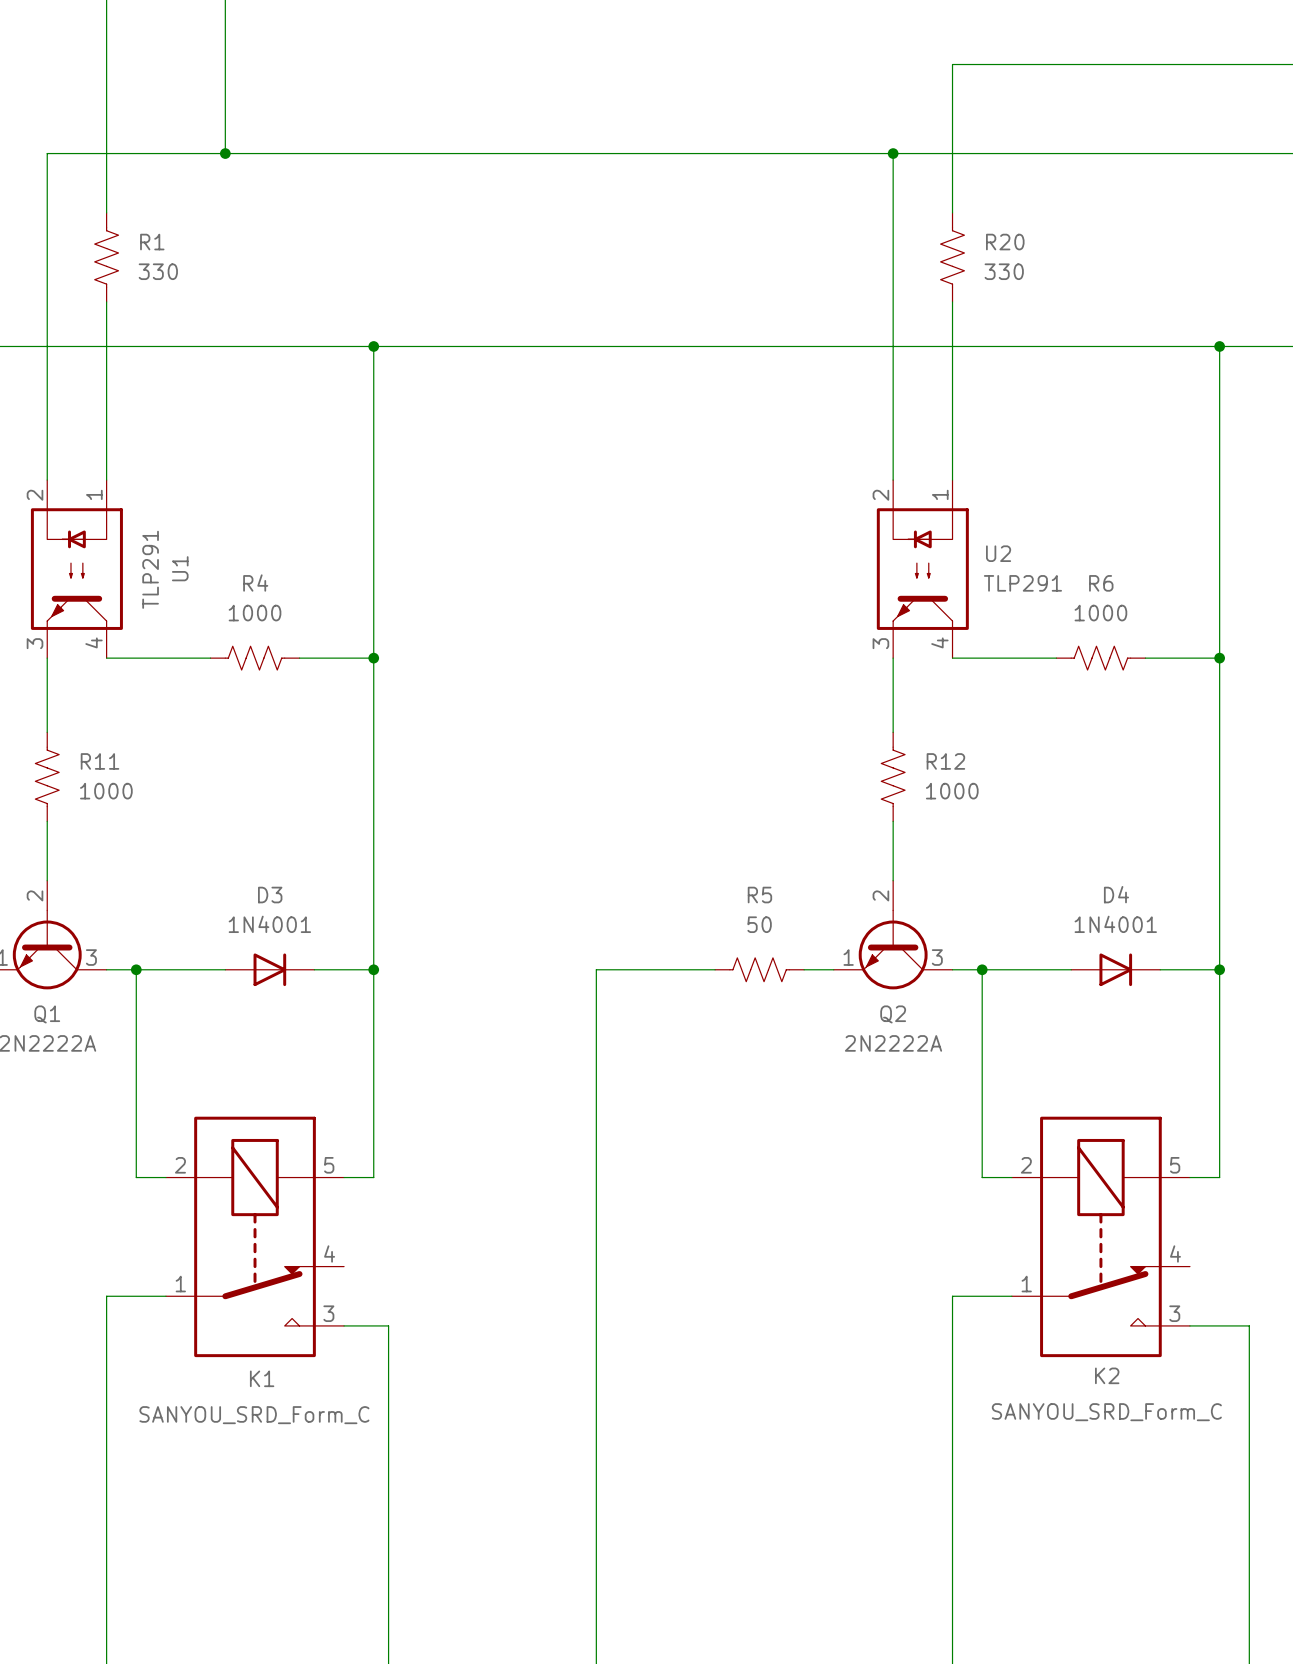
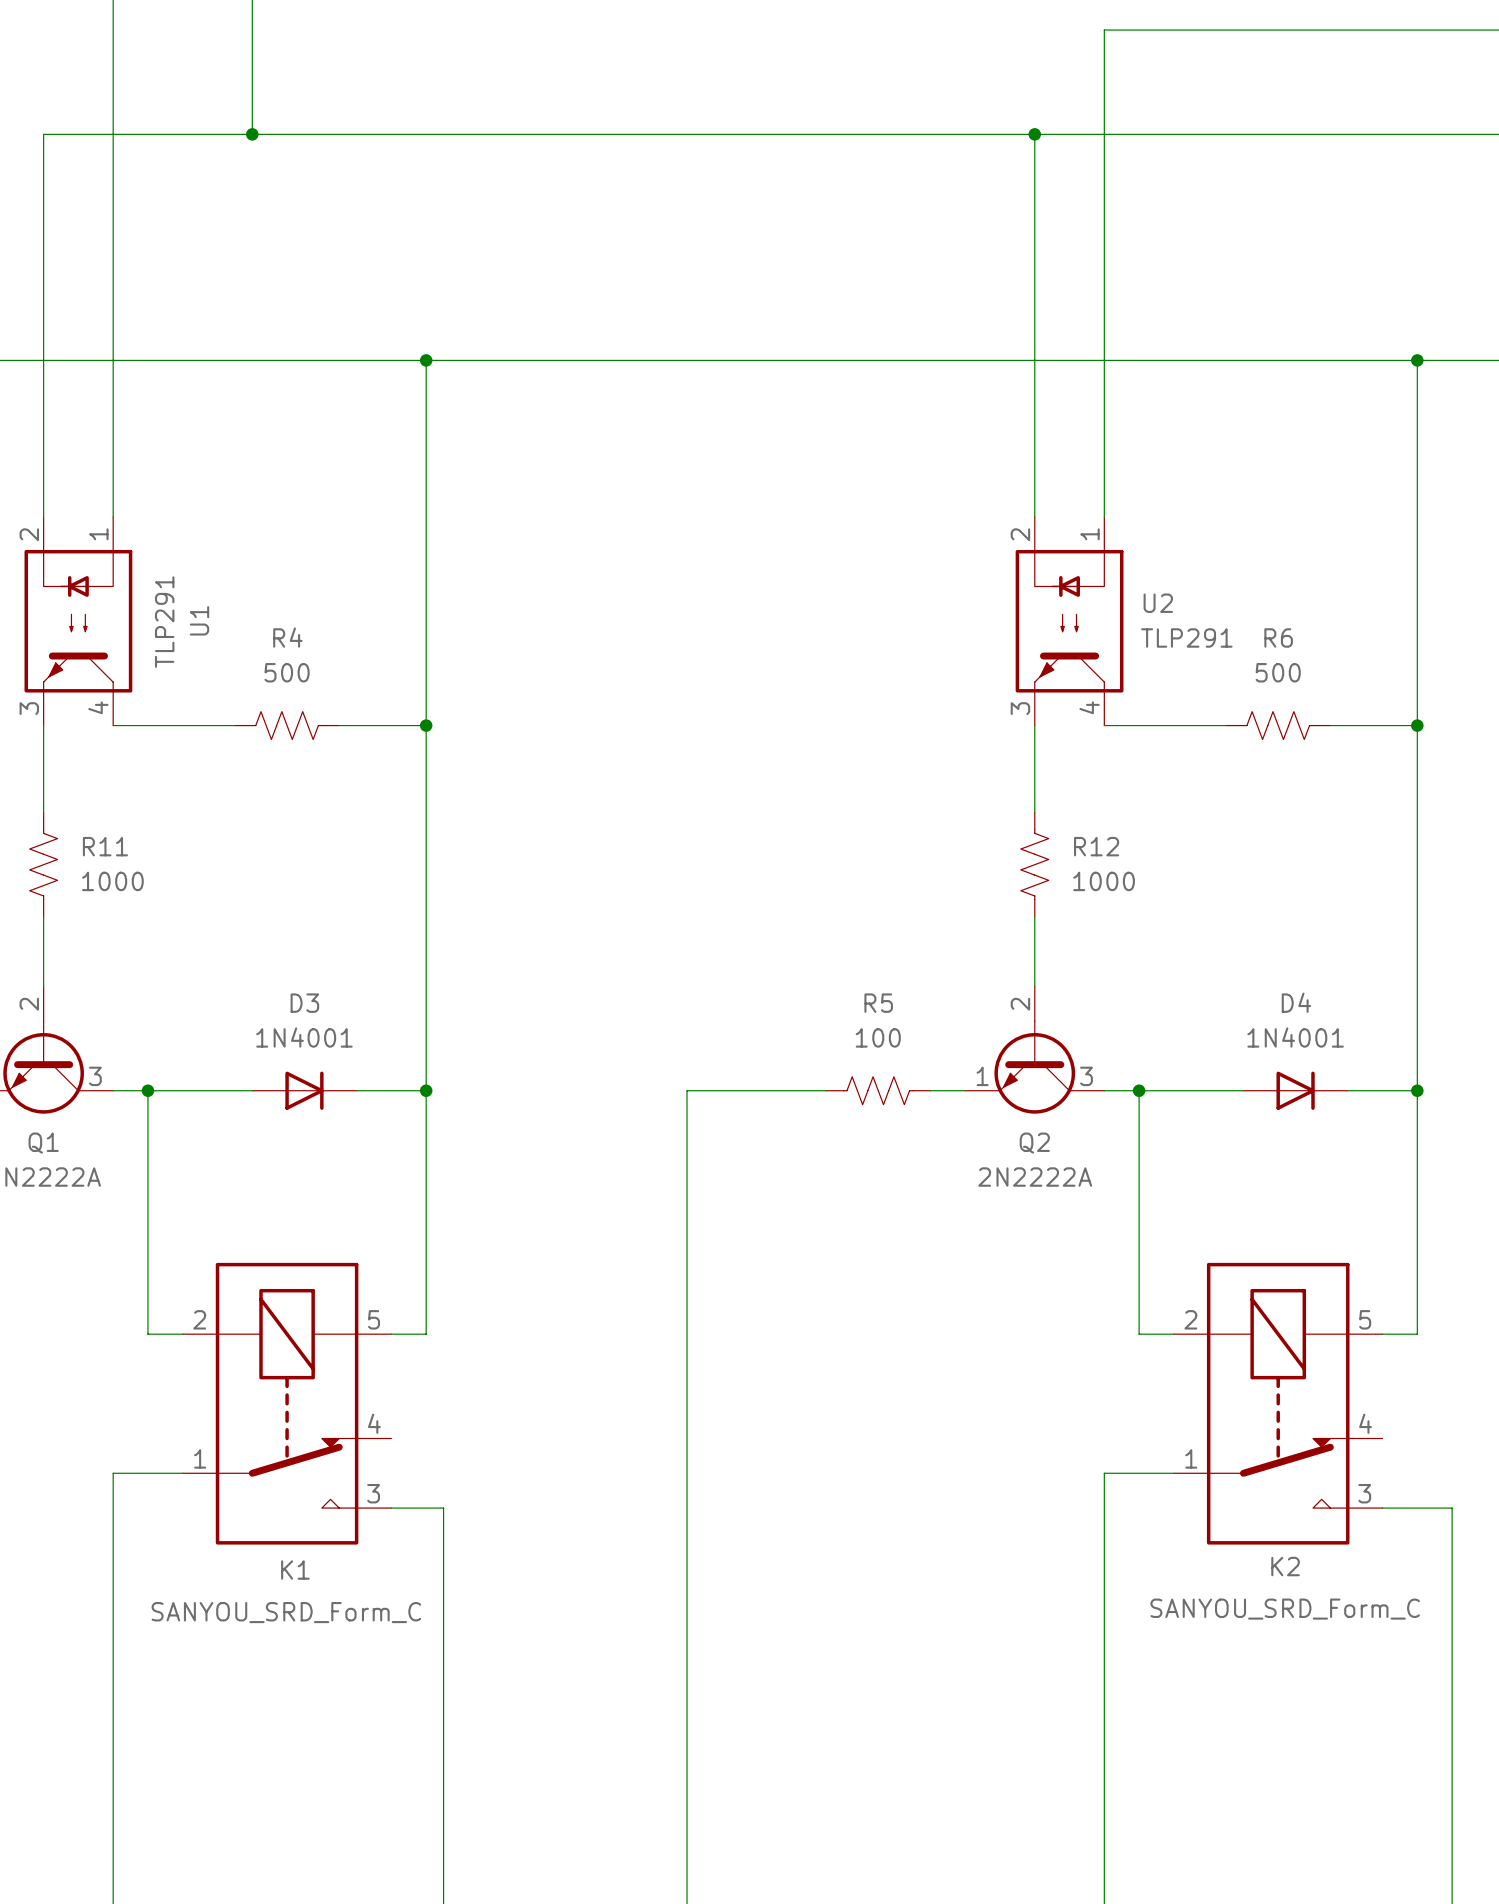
wire: none -> (113, 203) (113, 308)
wire: none -> (1104, 203) (1104, 308)
R1: 330 (106, 257) -> none
R20: 330 (952, 257) -> none
R4 value: 1000 (255, 613) -> 500 (287, 672)
R6 value: 1000 (1100, 613) -> 500 (1278, 672)
R5 value: 50 (759, 924) -> 100 (878, 1037)

